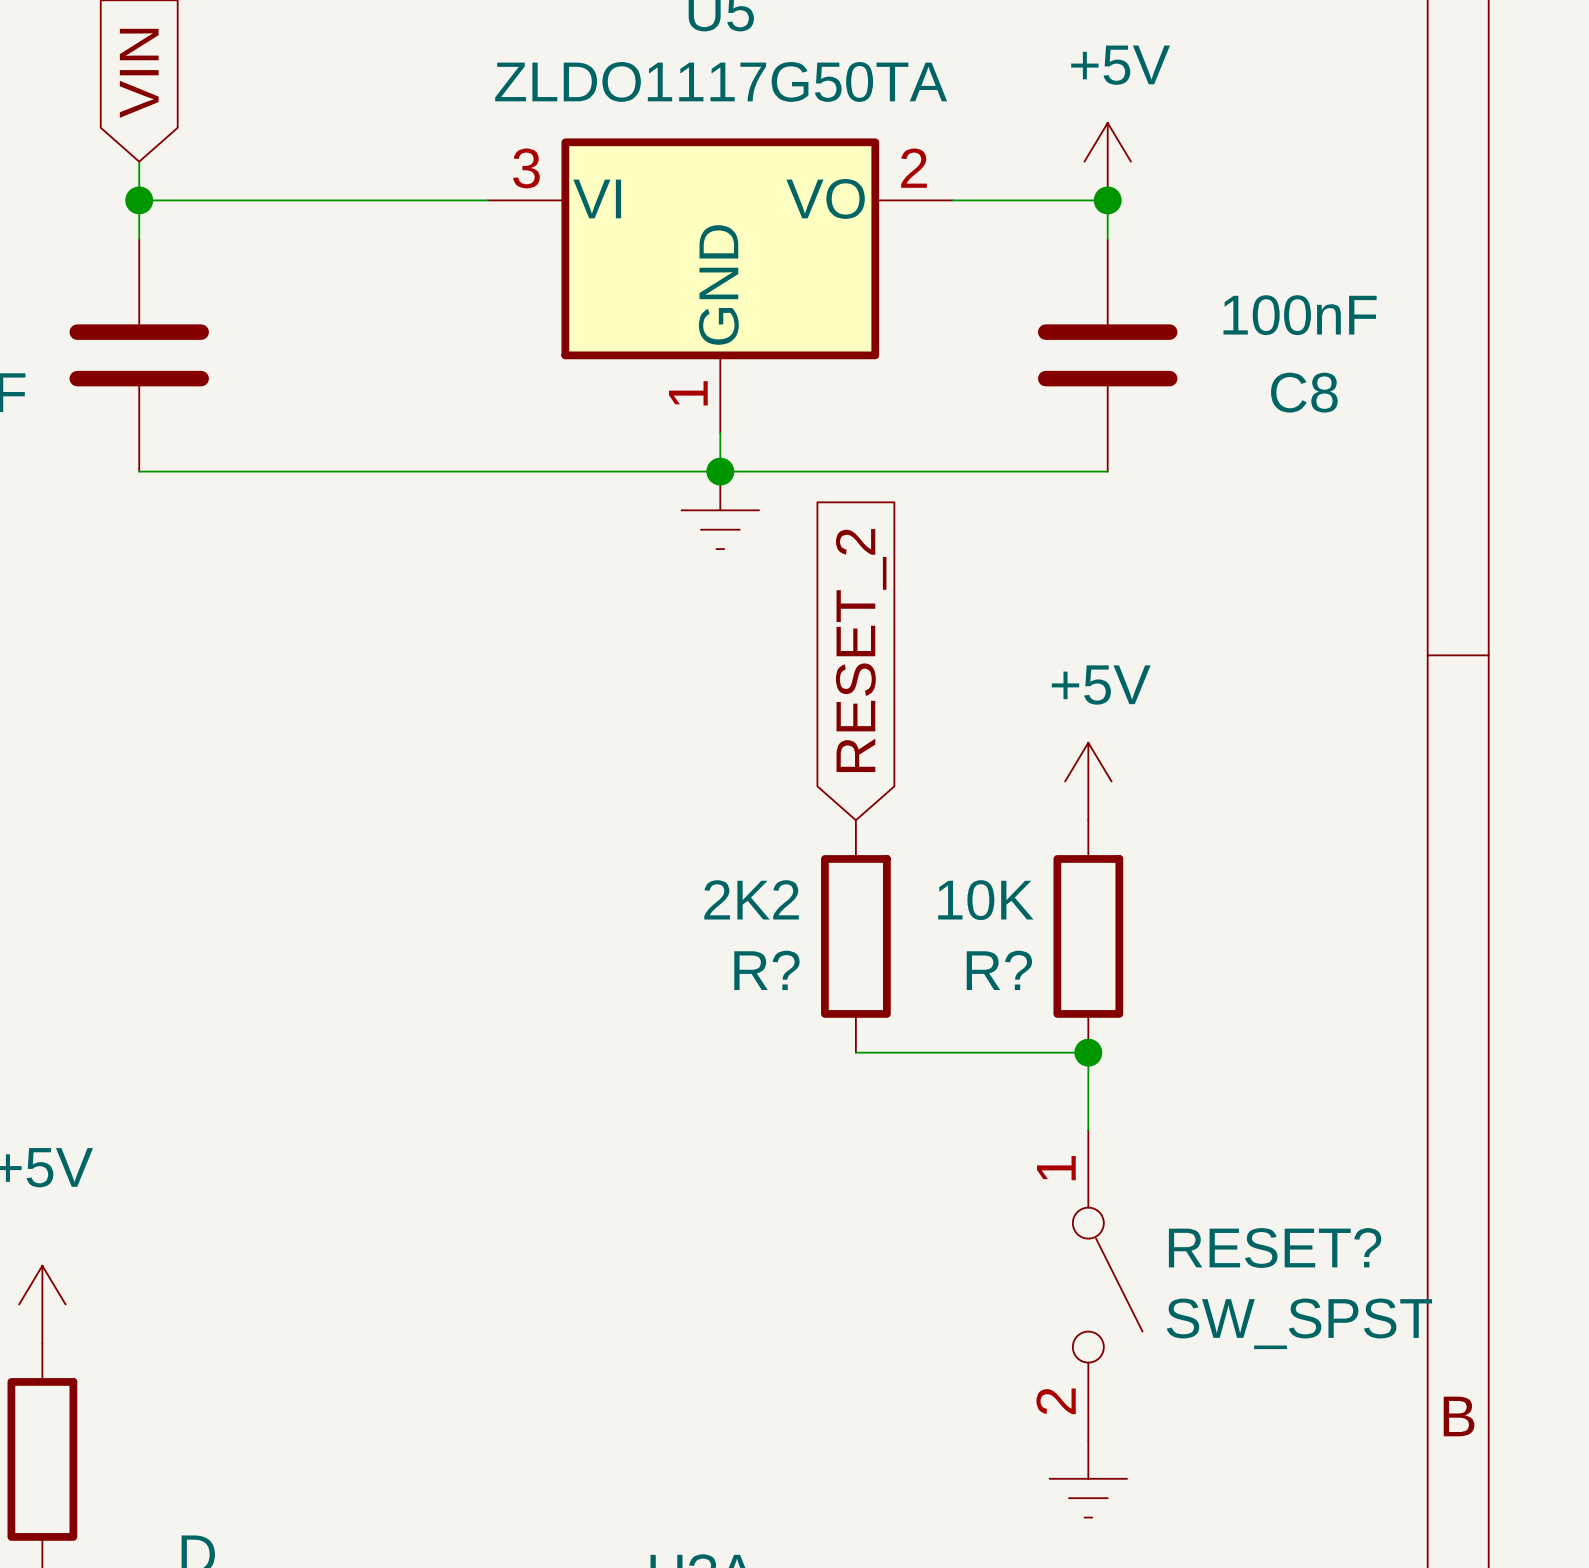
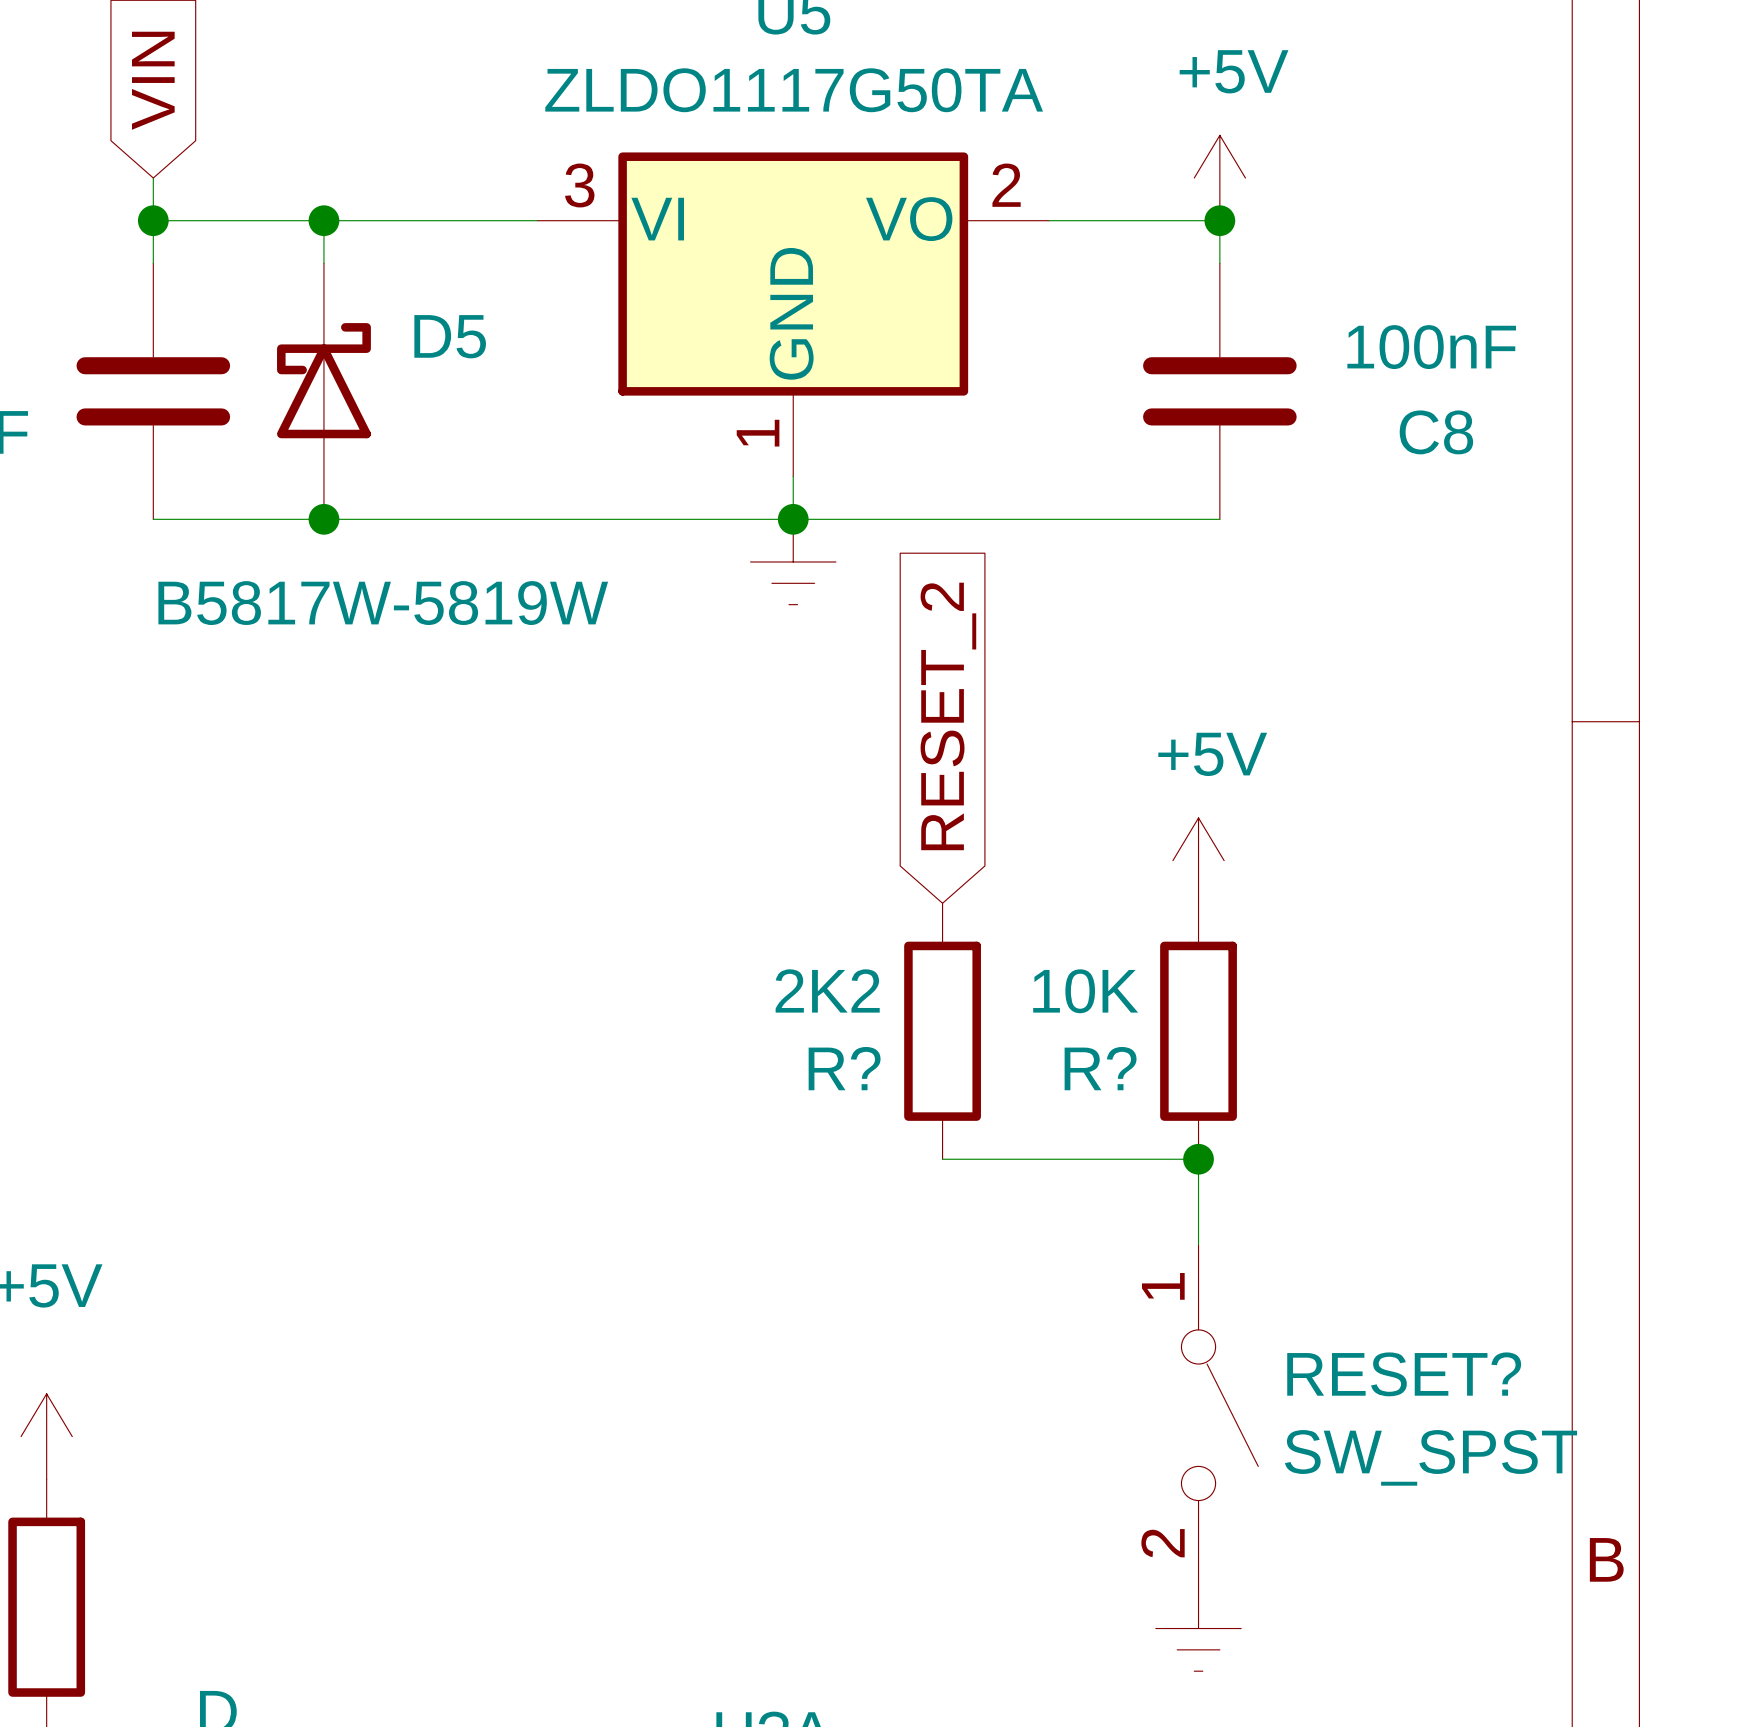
wire: none -> (323, 220) (323, 263)
junction: none -> (323, 220)
D5: none -> B5817W-5819W (323, 391)
junction: none -> (323, 519)

